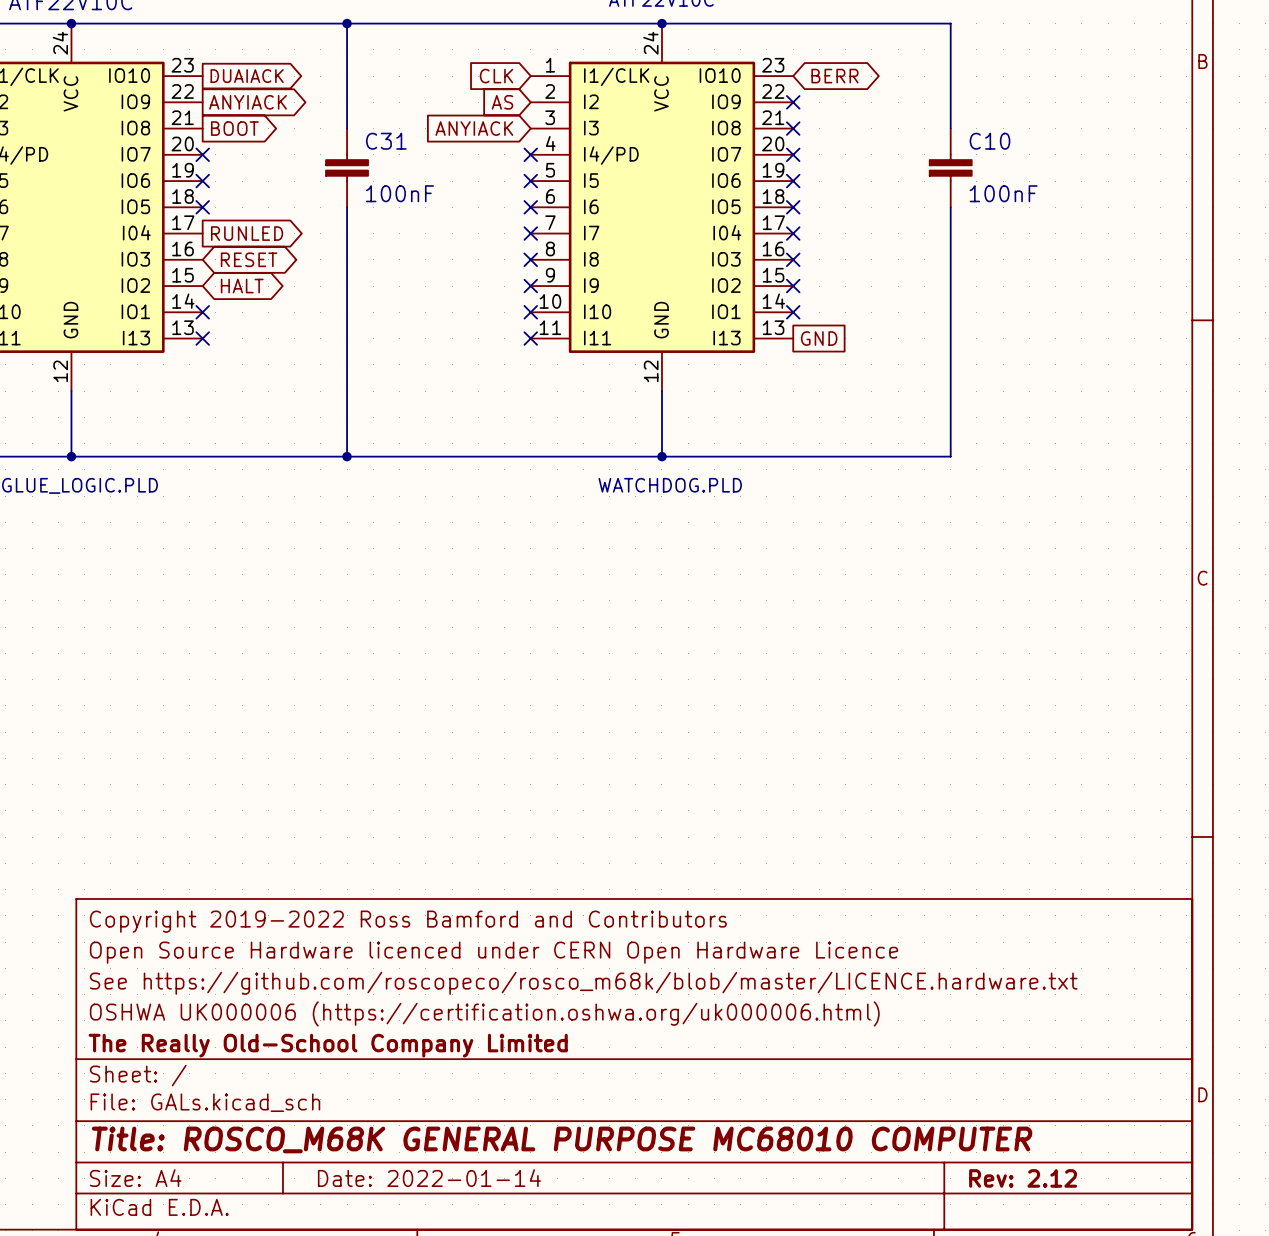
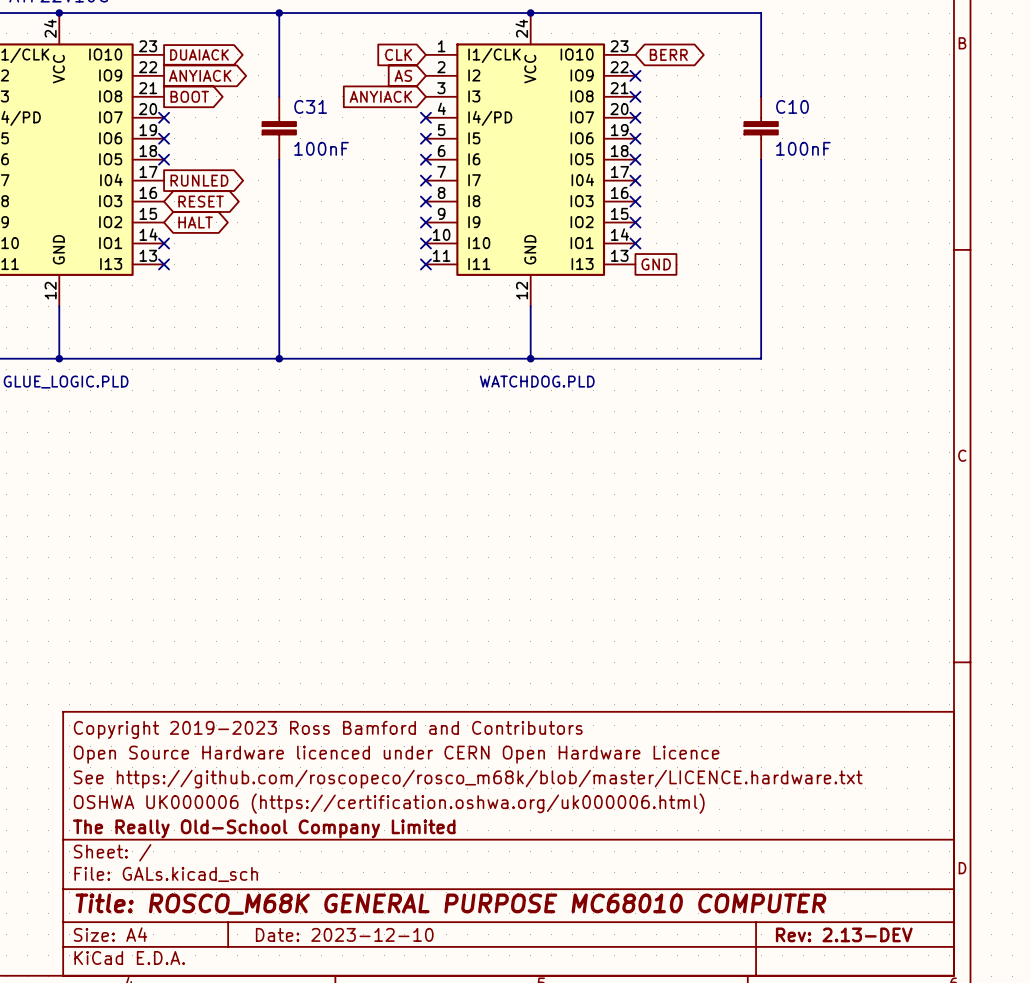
title block: Copyright 2019-2022 Ross Bamford and Contributors (408, 921) -> Copyright 2019-2023 Ross Bamford and Contributors (328, 729)
title block: Date: 2022-01-14 (429, 1178) -> Date: 2023-12-10 (344, 934)
title block: Rev: 2.12 (1023, 1178) -> Rev: 2.13-DEV (844, 934)

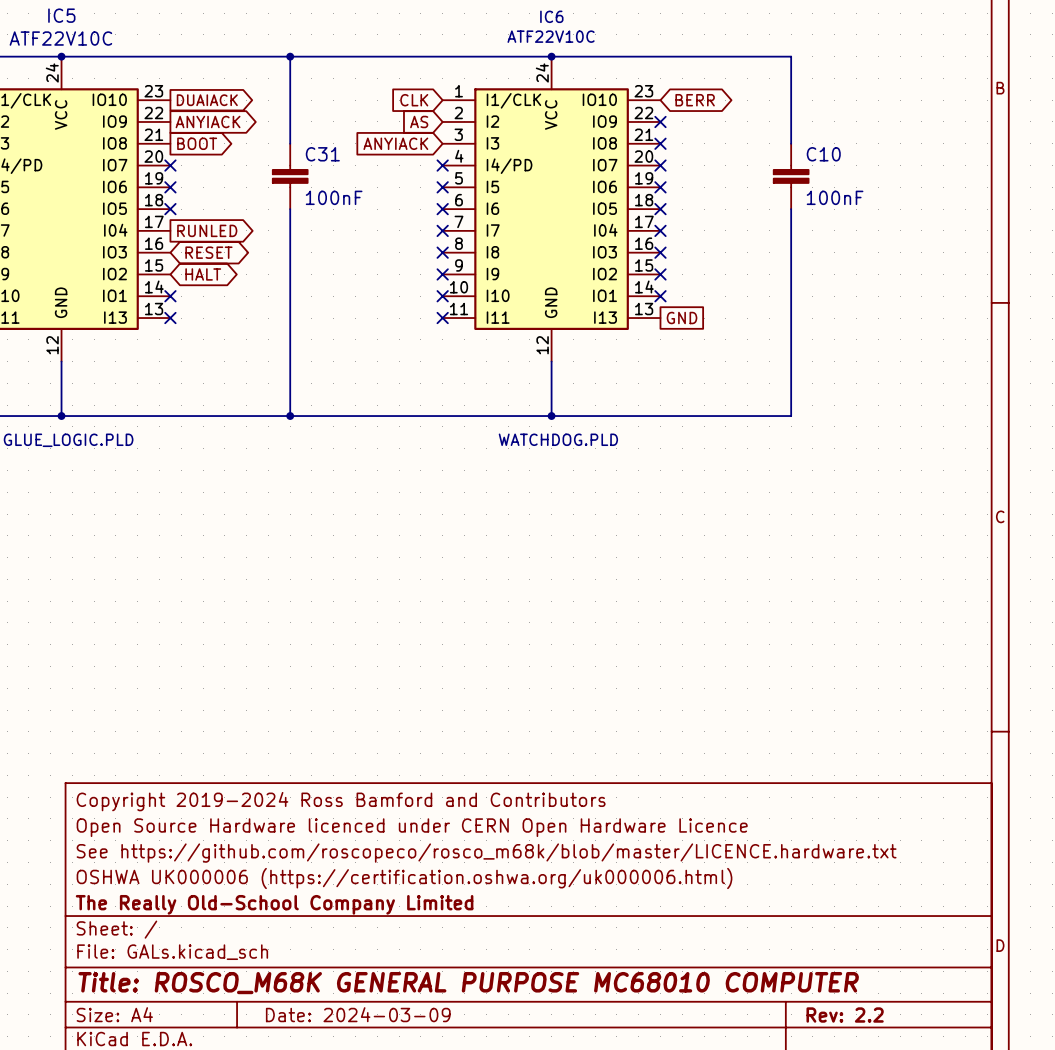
title block: Copyright 2019-2023 Ross Bamford and Contributors (328, 729) -> Copyright 2019-2024 Ross Bamford and Contributors (341, 801)
title block: Date: 2023-12-10 (344, 934) -> Date: 2024-03-09 (358, 1014)
title block: Rev: 2.13-DEV (844, 934) -> Rev: 2.2 (845, 1015)

